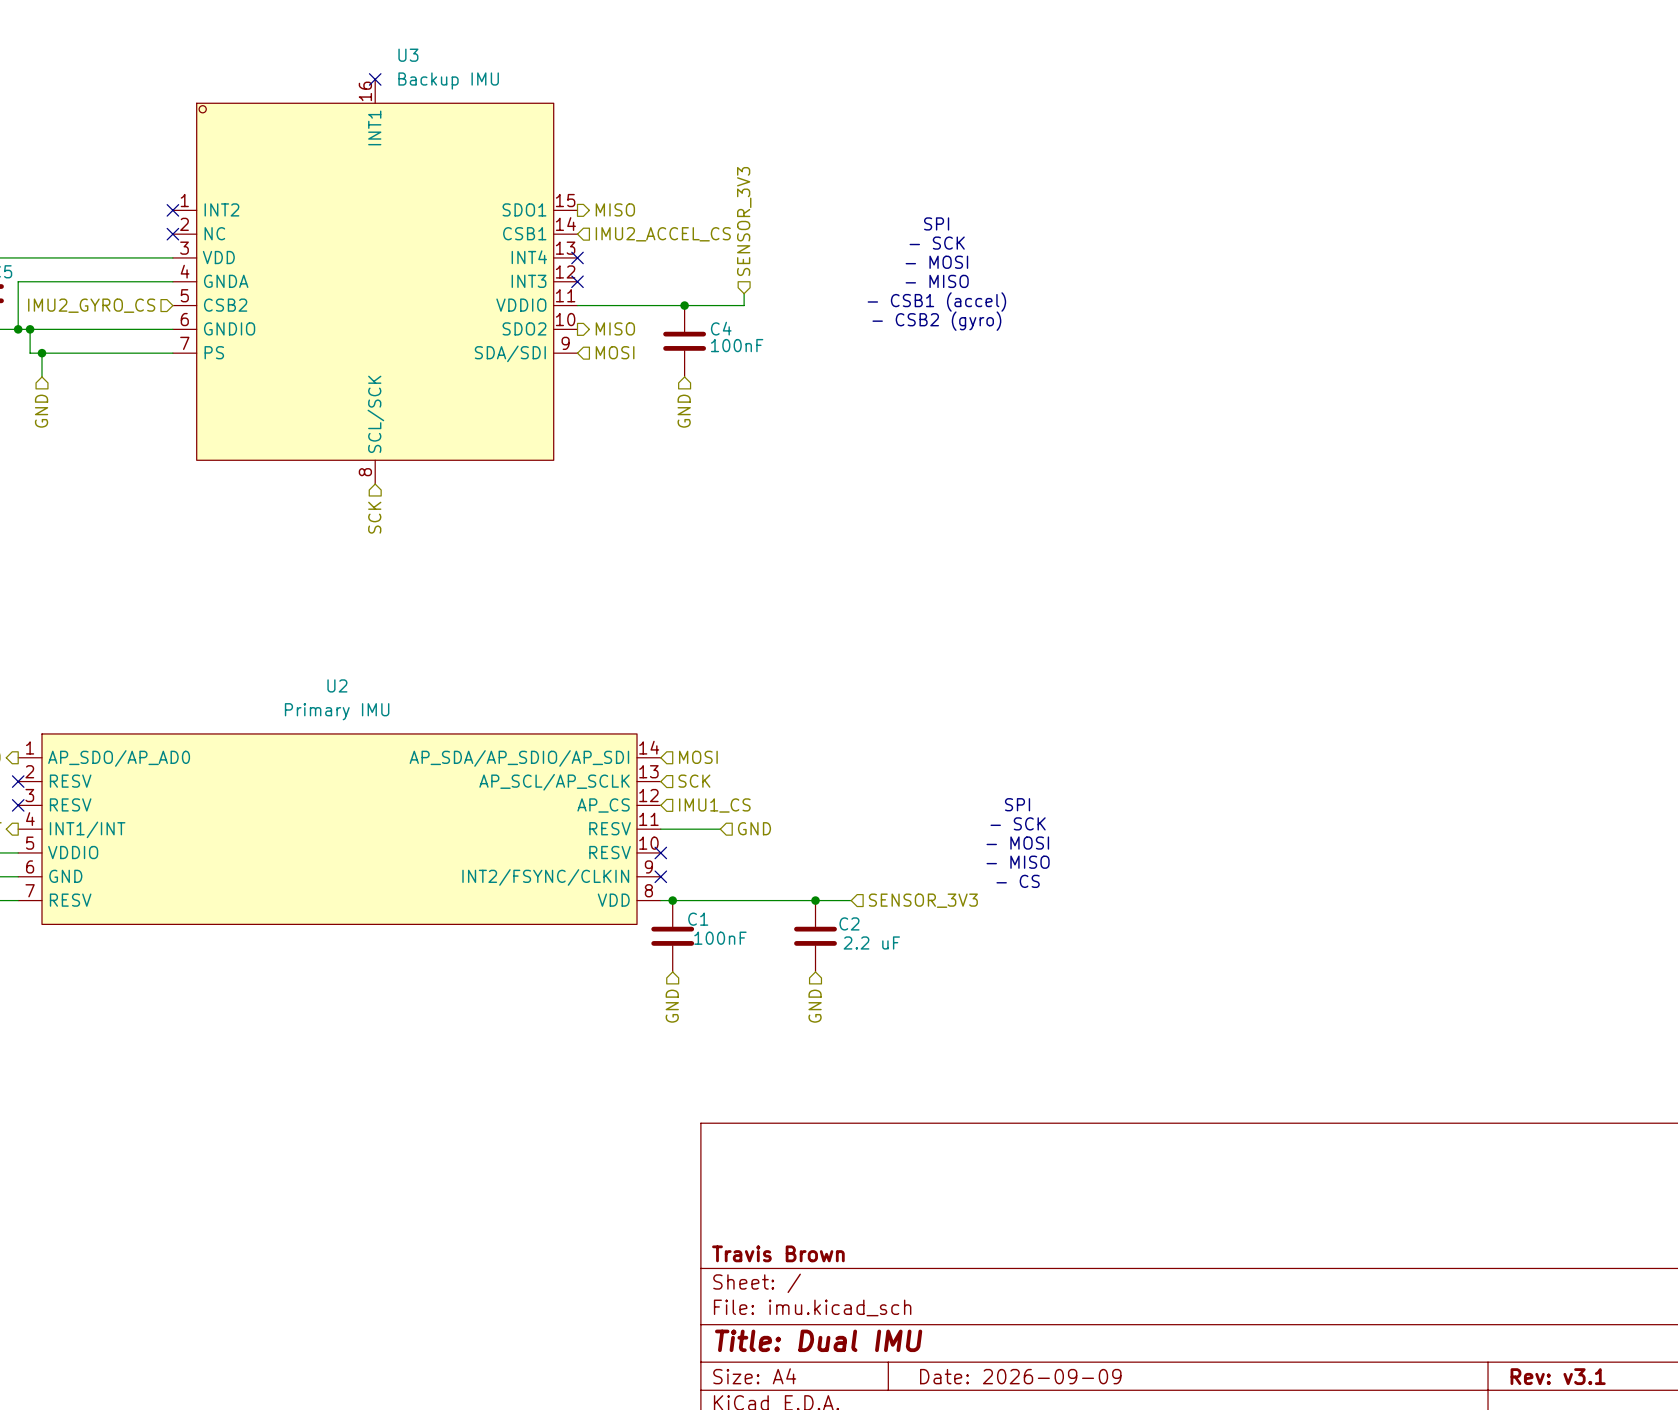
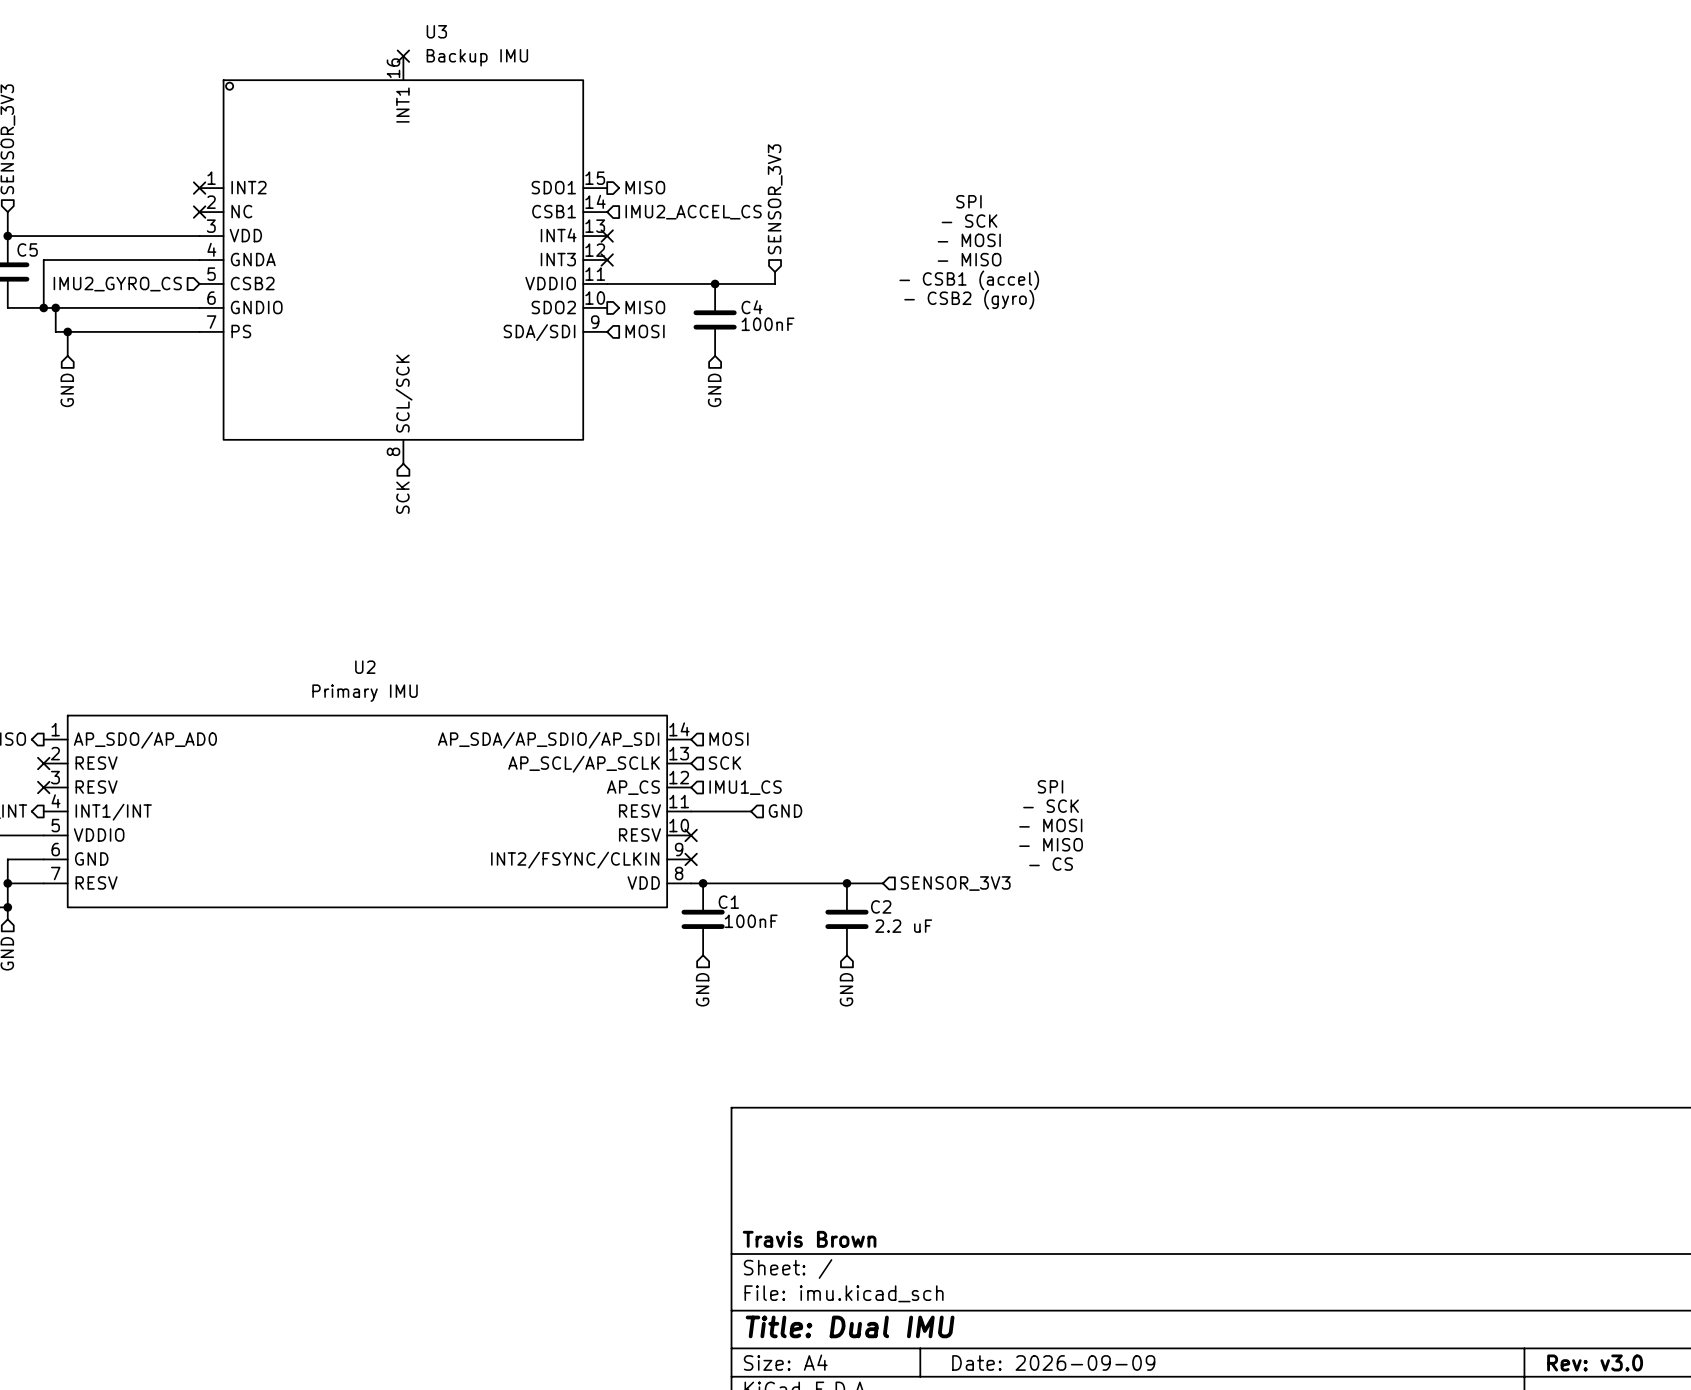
title block: Rev: v3.1 (1558, 1376) -> Rev: v3.0 (1595, 1362)

